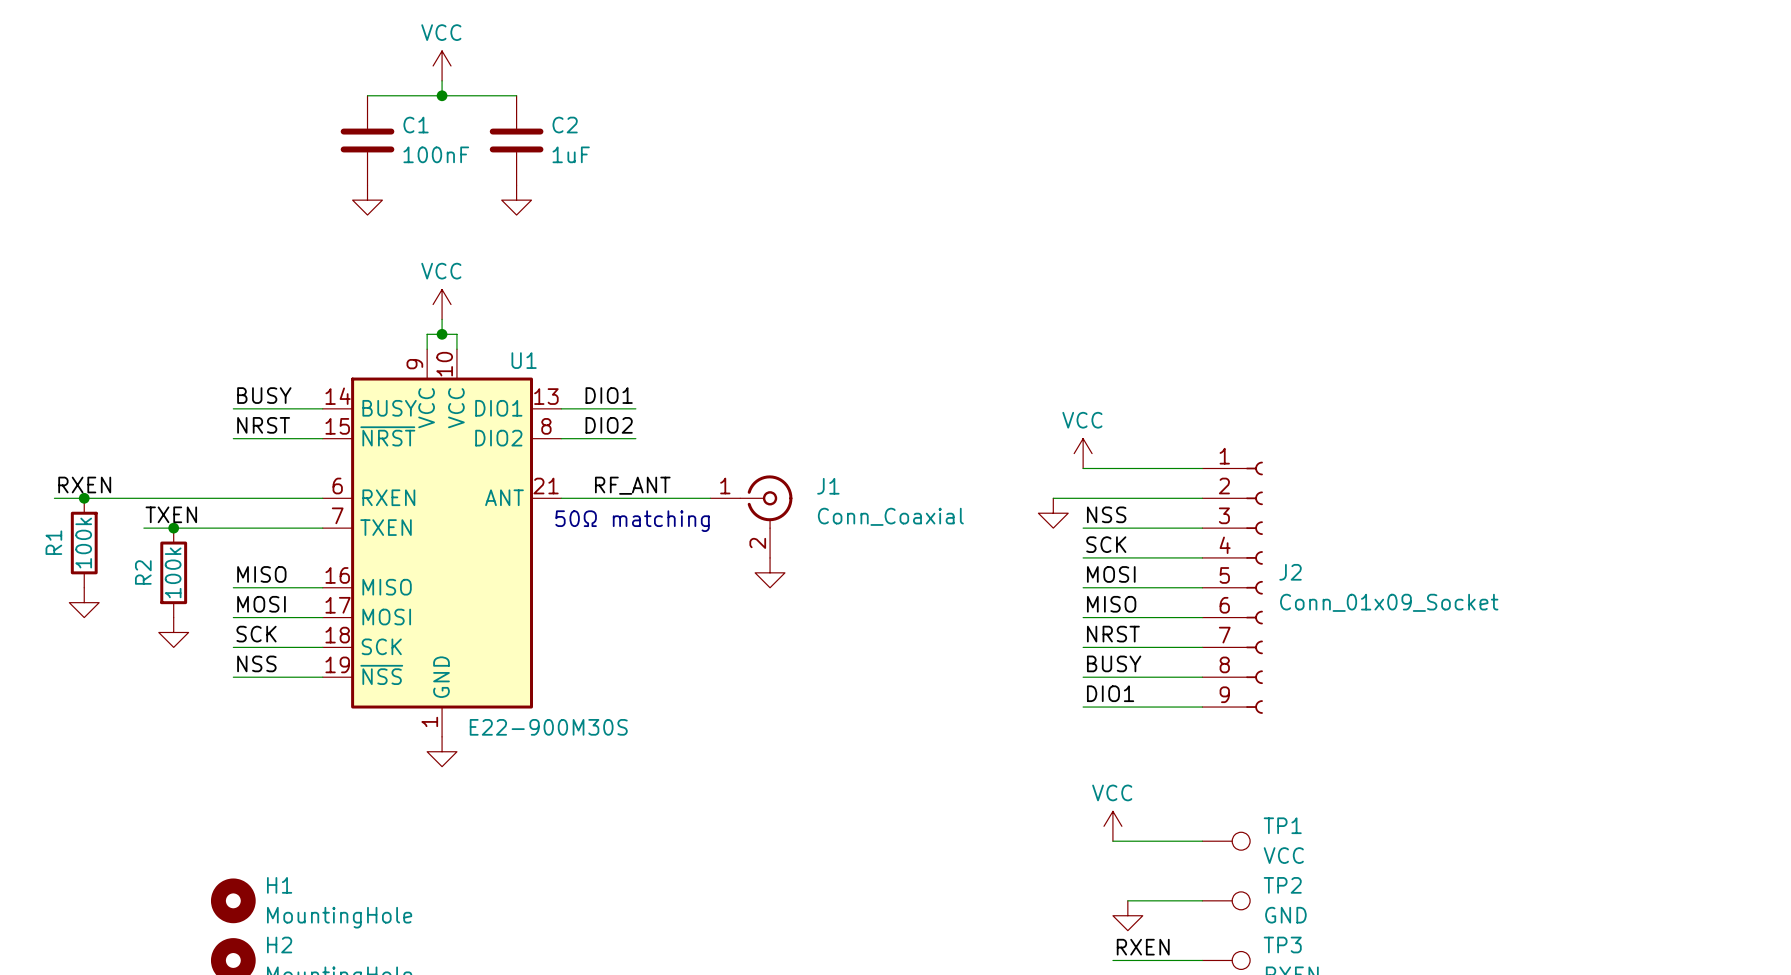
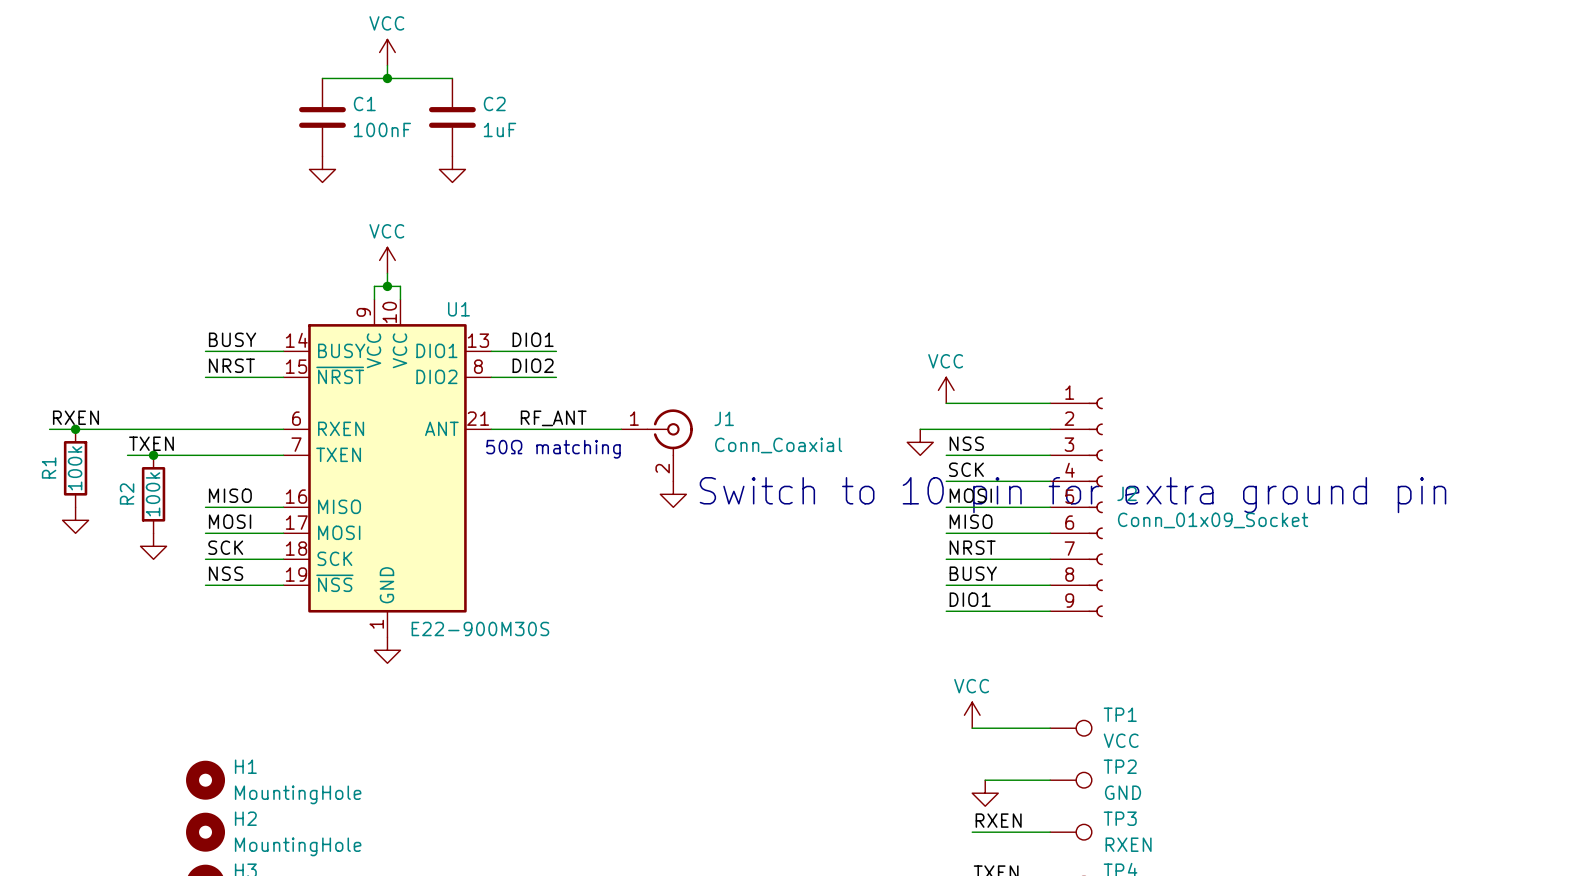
text: none -> Switch to 10 pin for extra ground pin (1072, 495)

